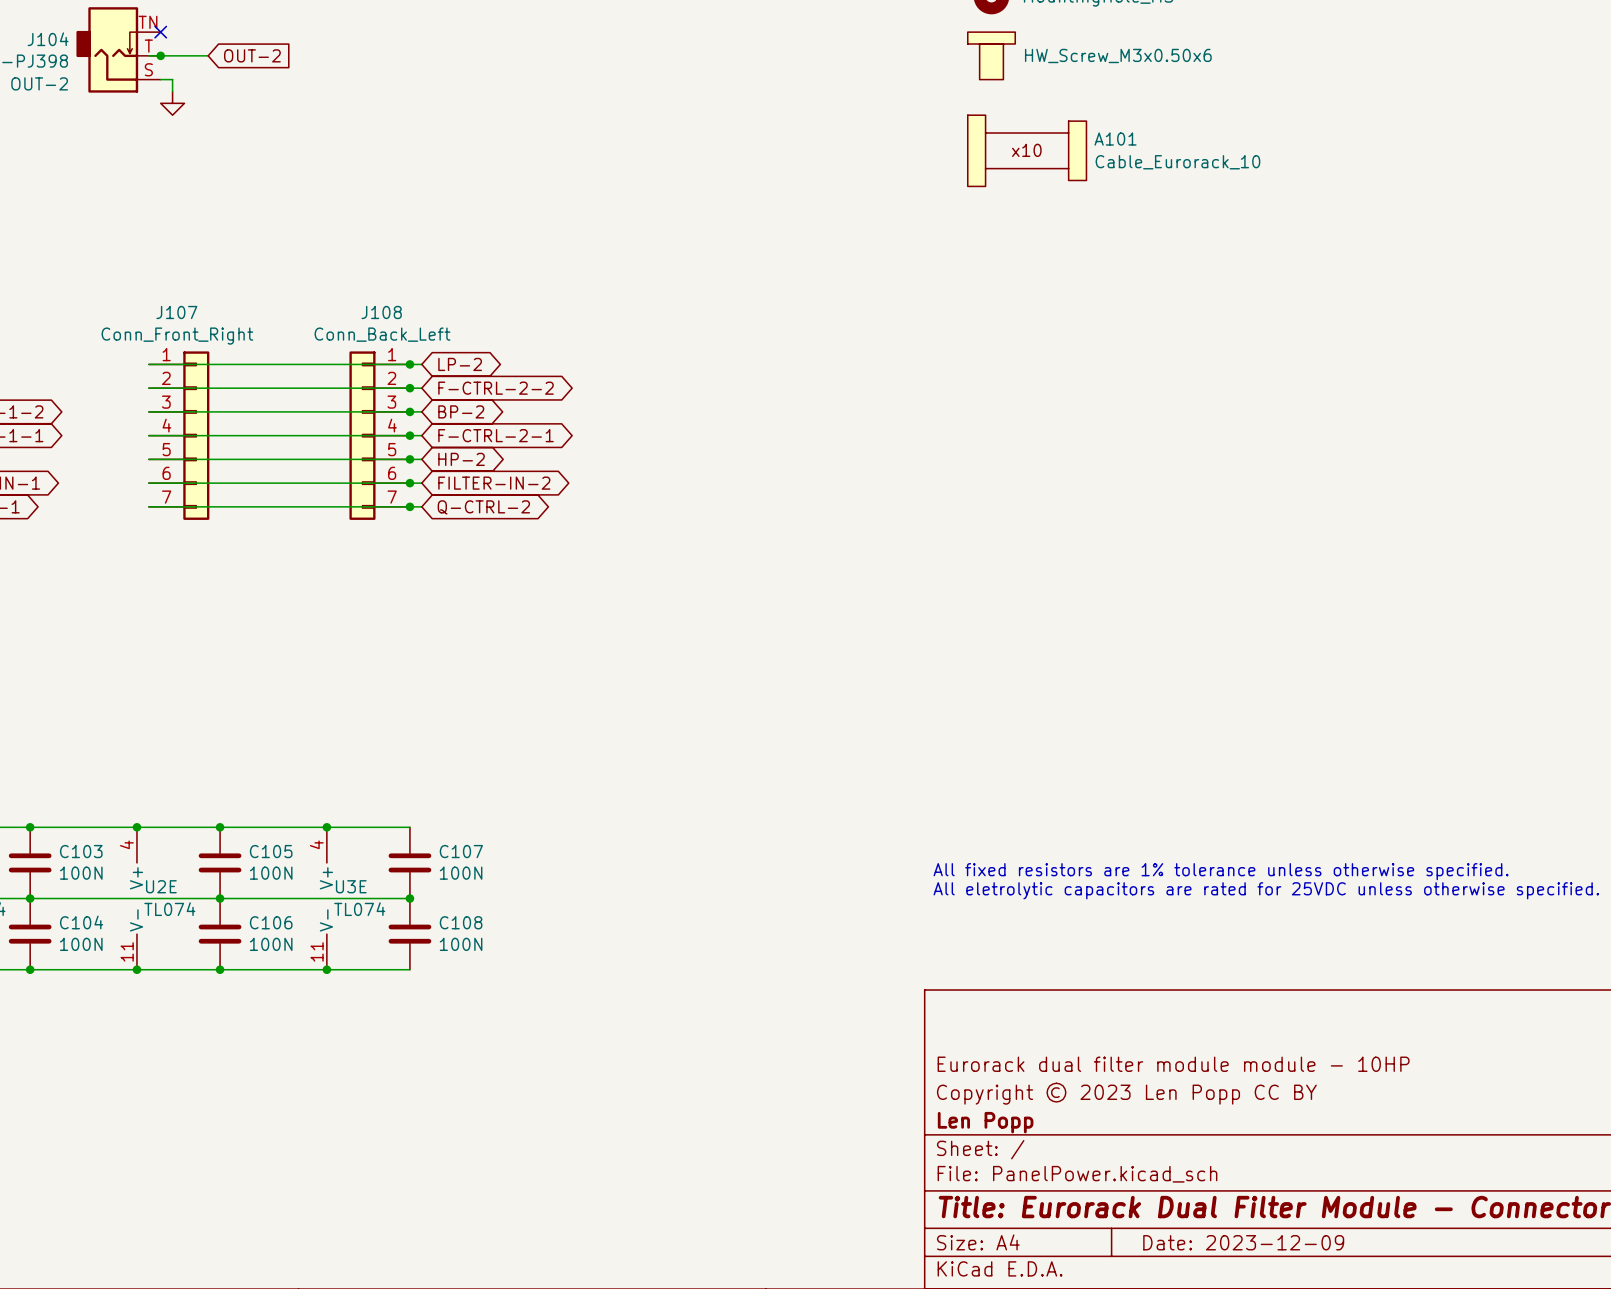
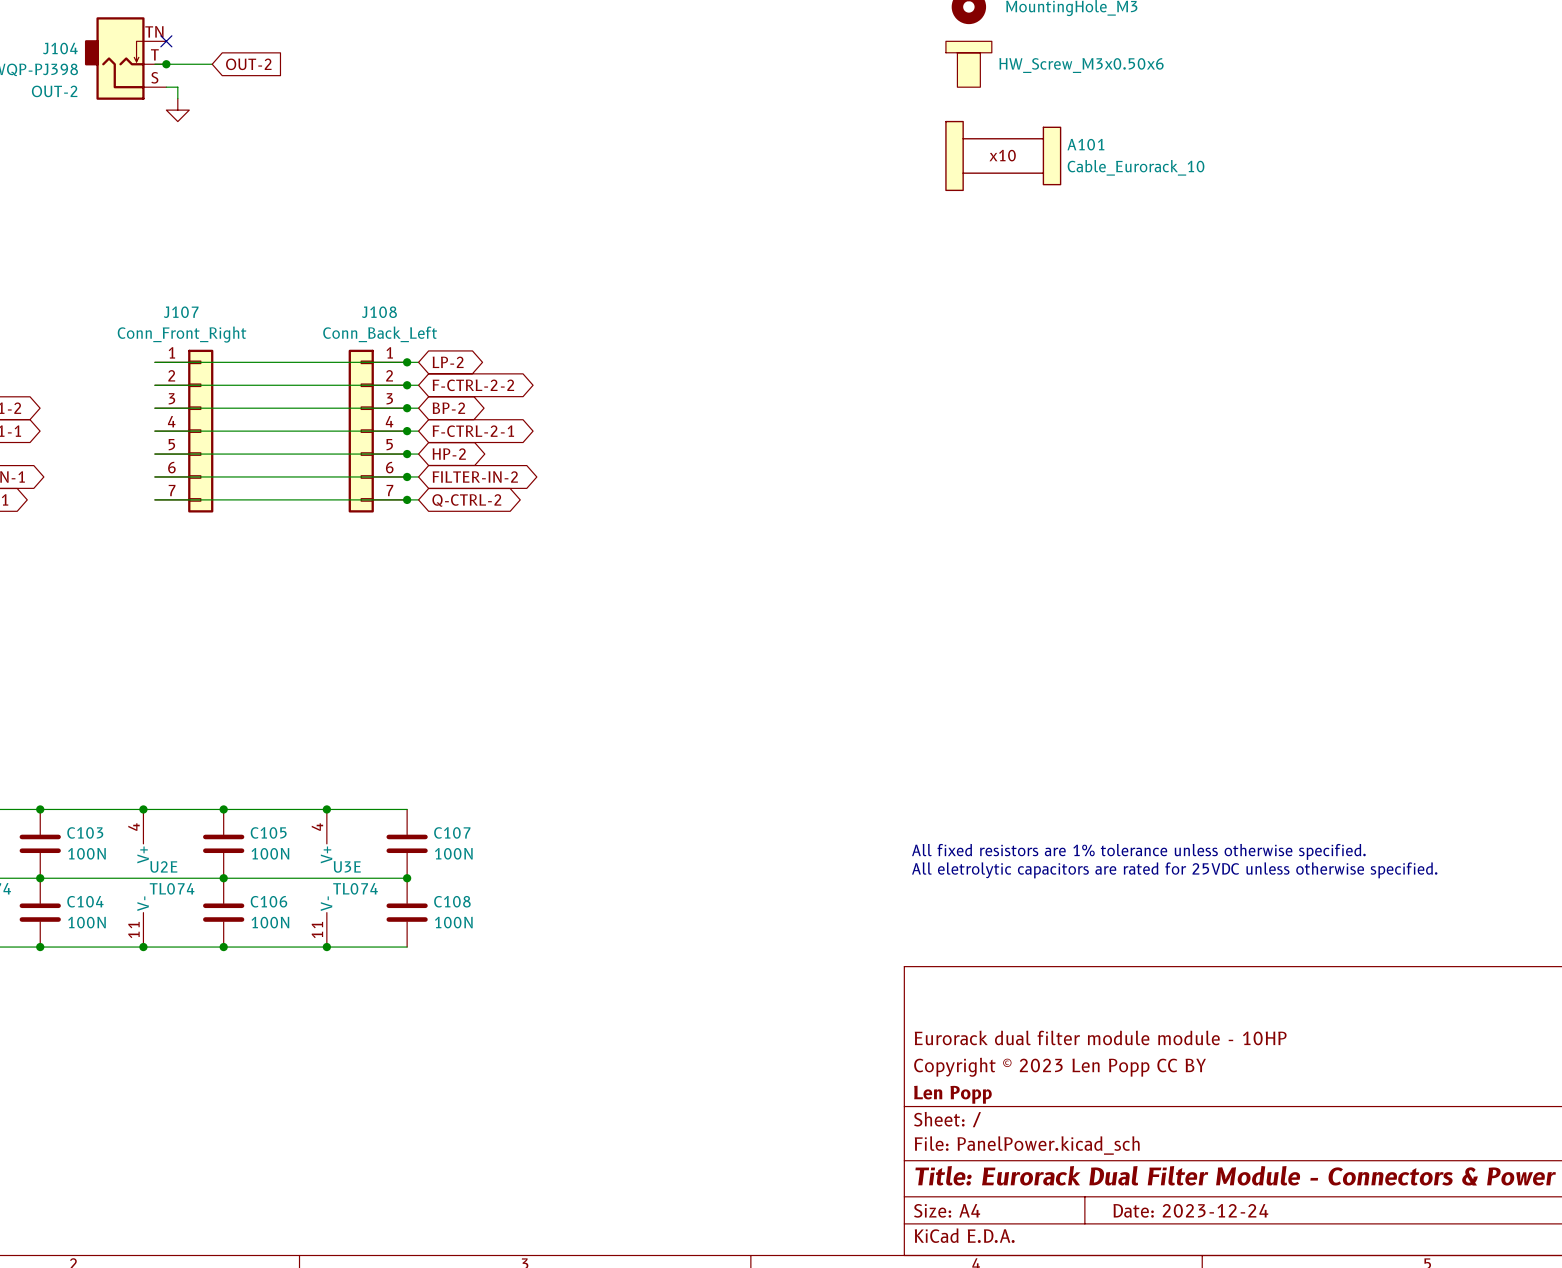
title block: Date: 2023-12-09 (1243, 1242) -> Date: 2023-12-24 (1190, 1210)

